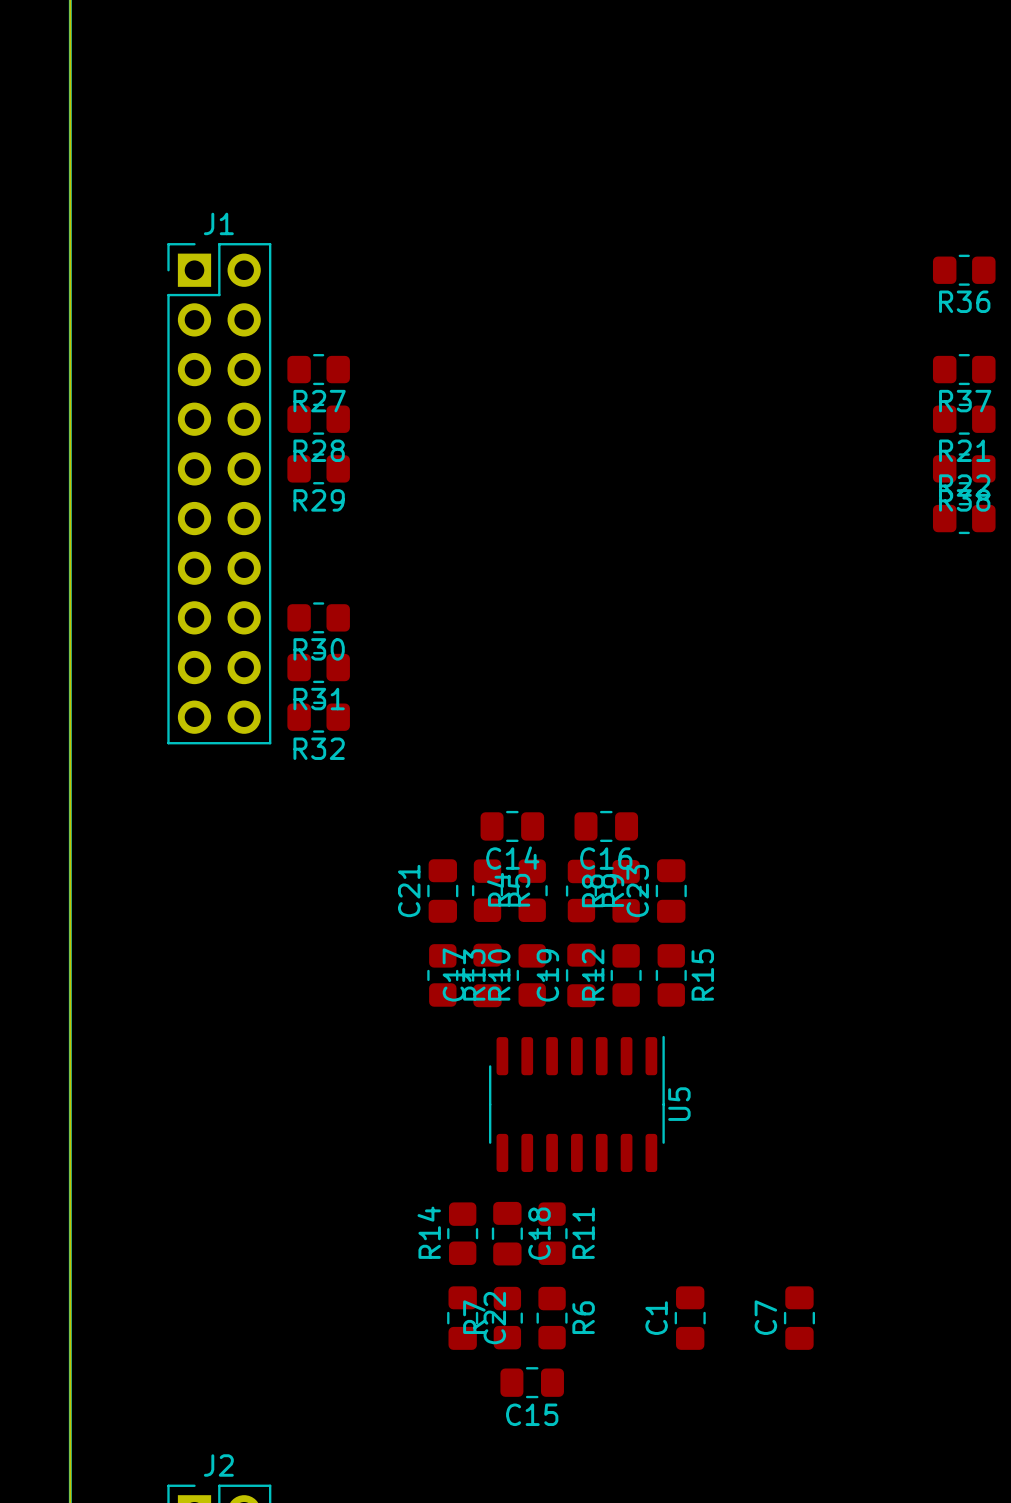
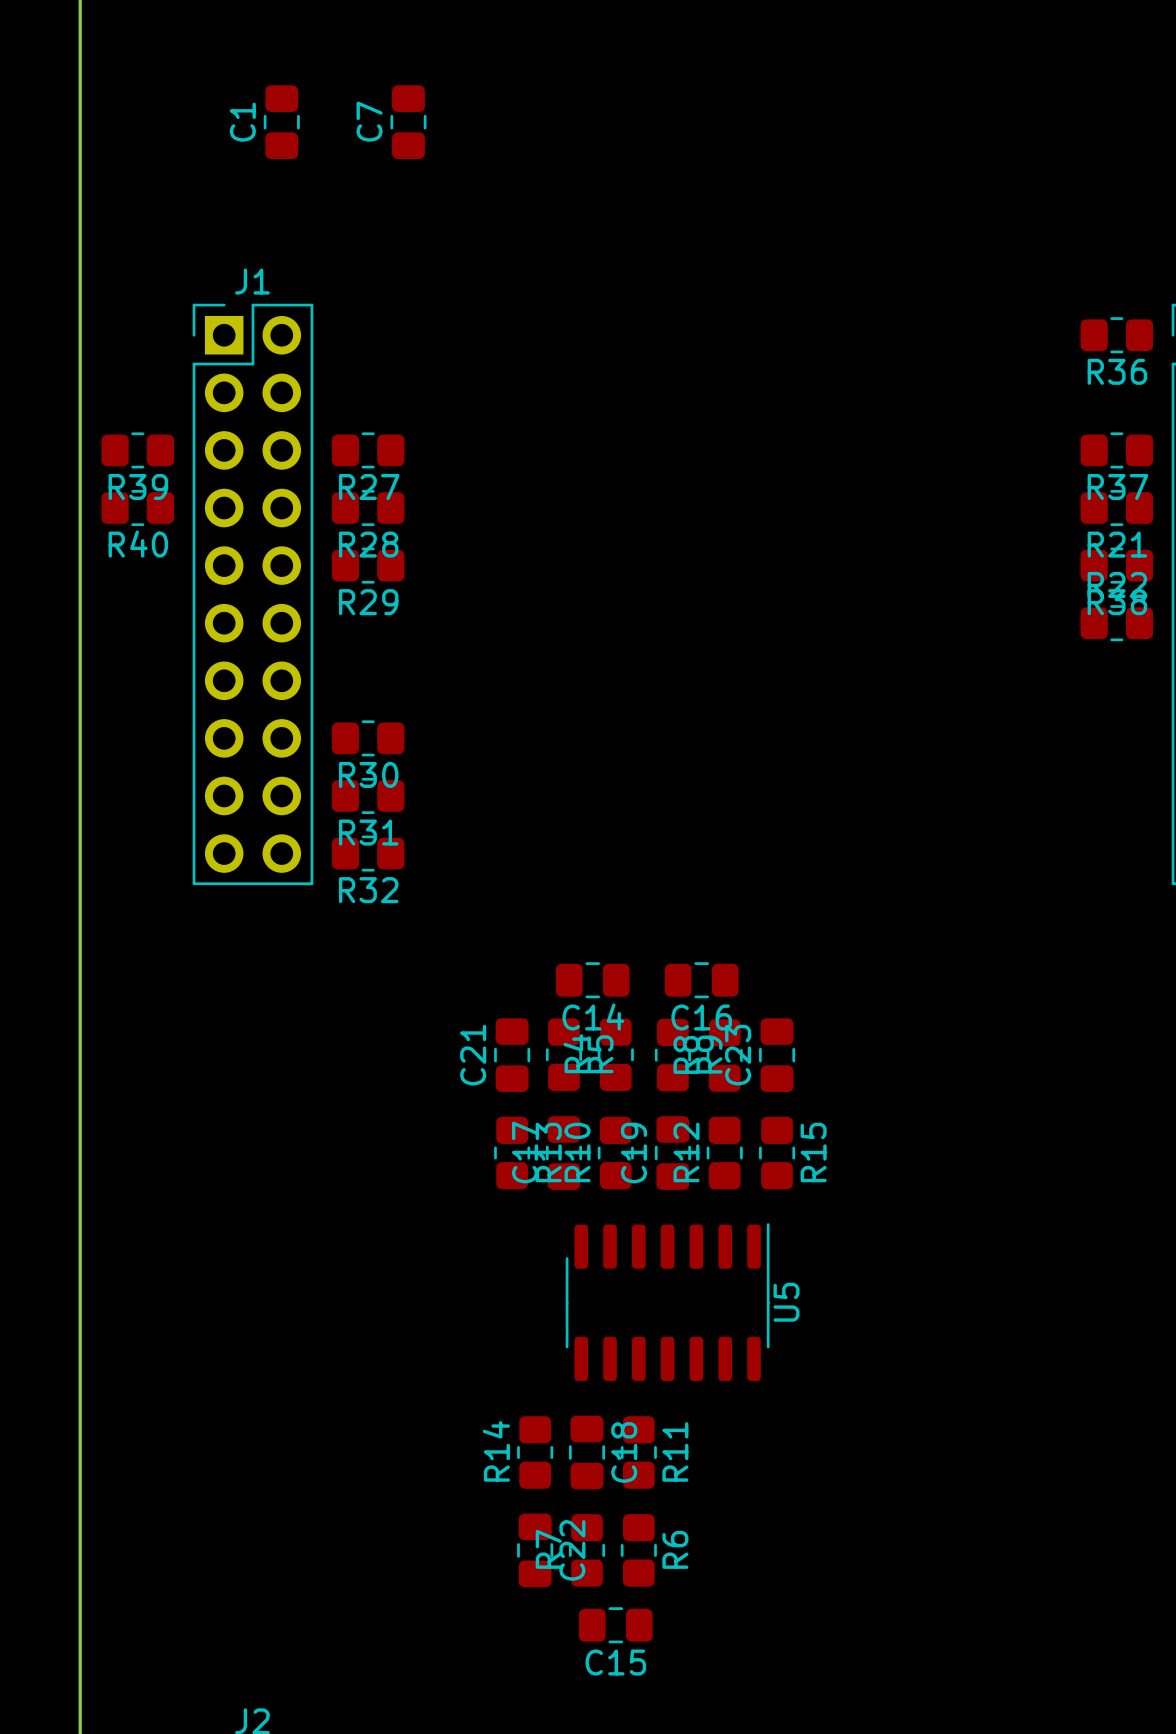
R39: none -> (137, 450)
R40: none -> (137, 508)
C1 position: (690, 1318) -> (281, 122)
C7 position: (799, 1318) -> (408, 122)

